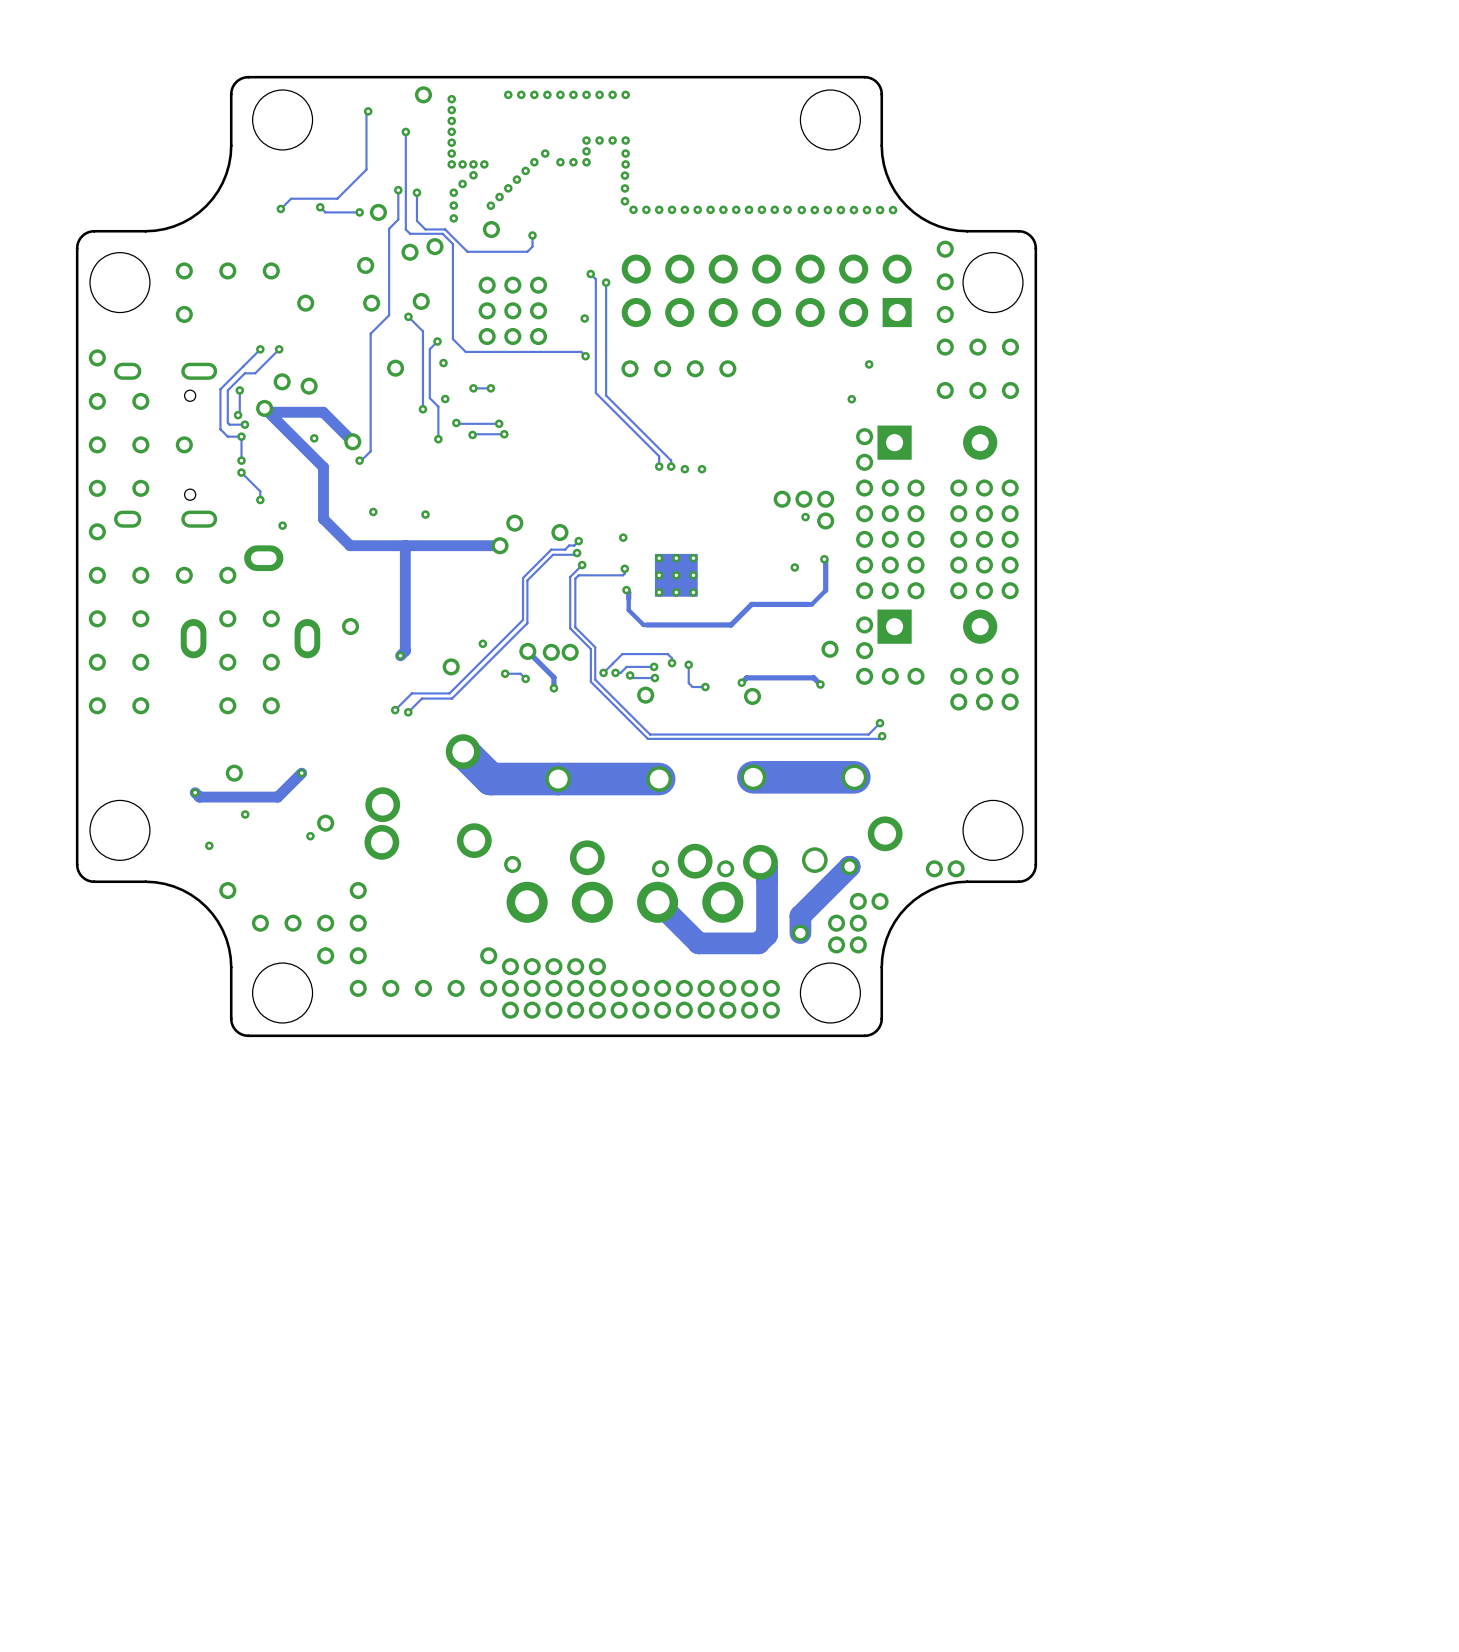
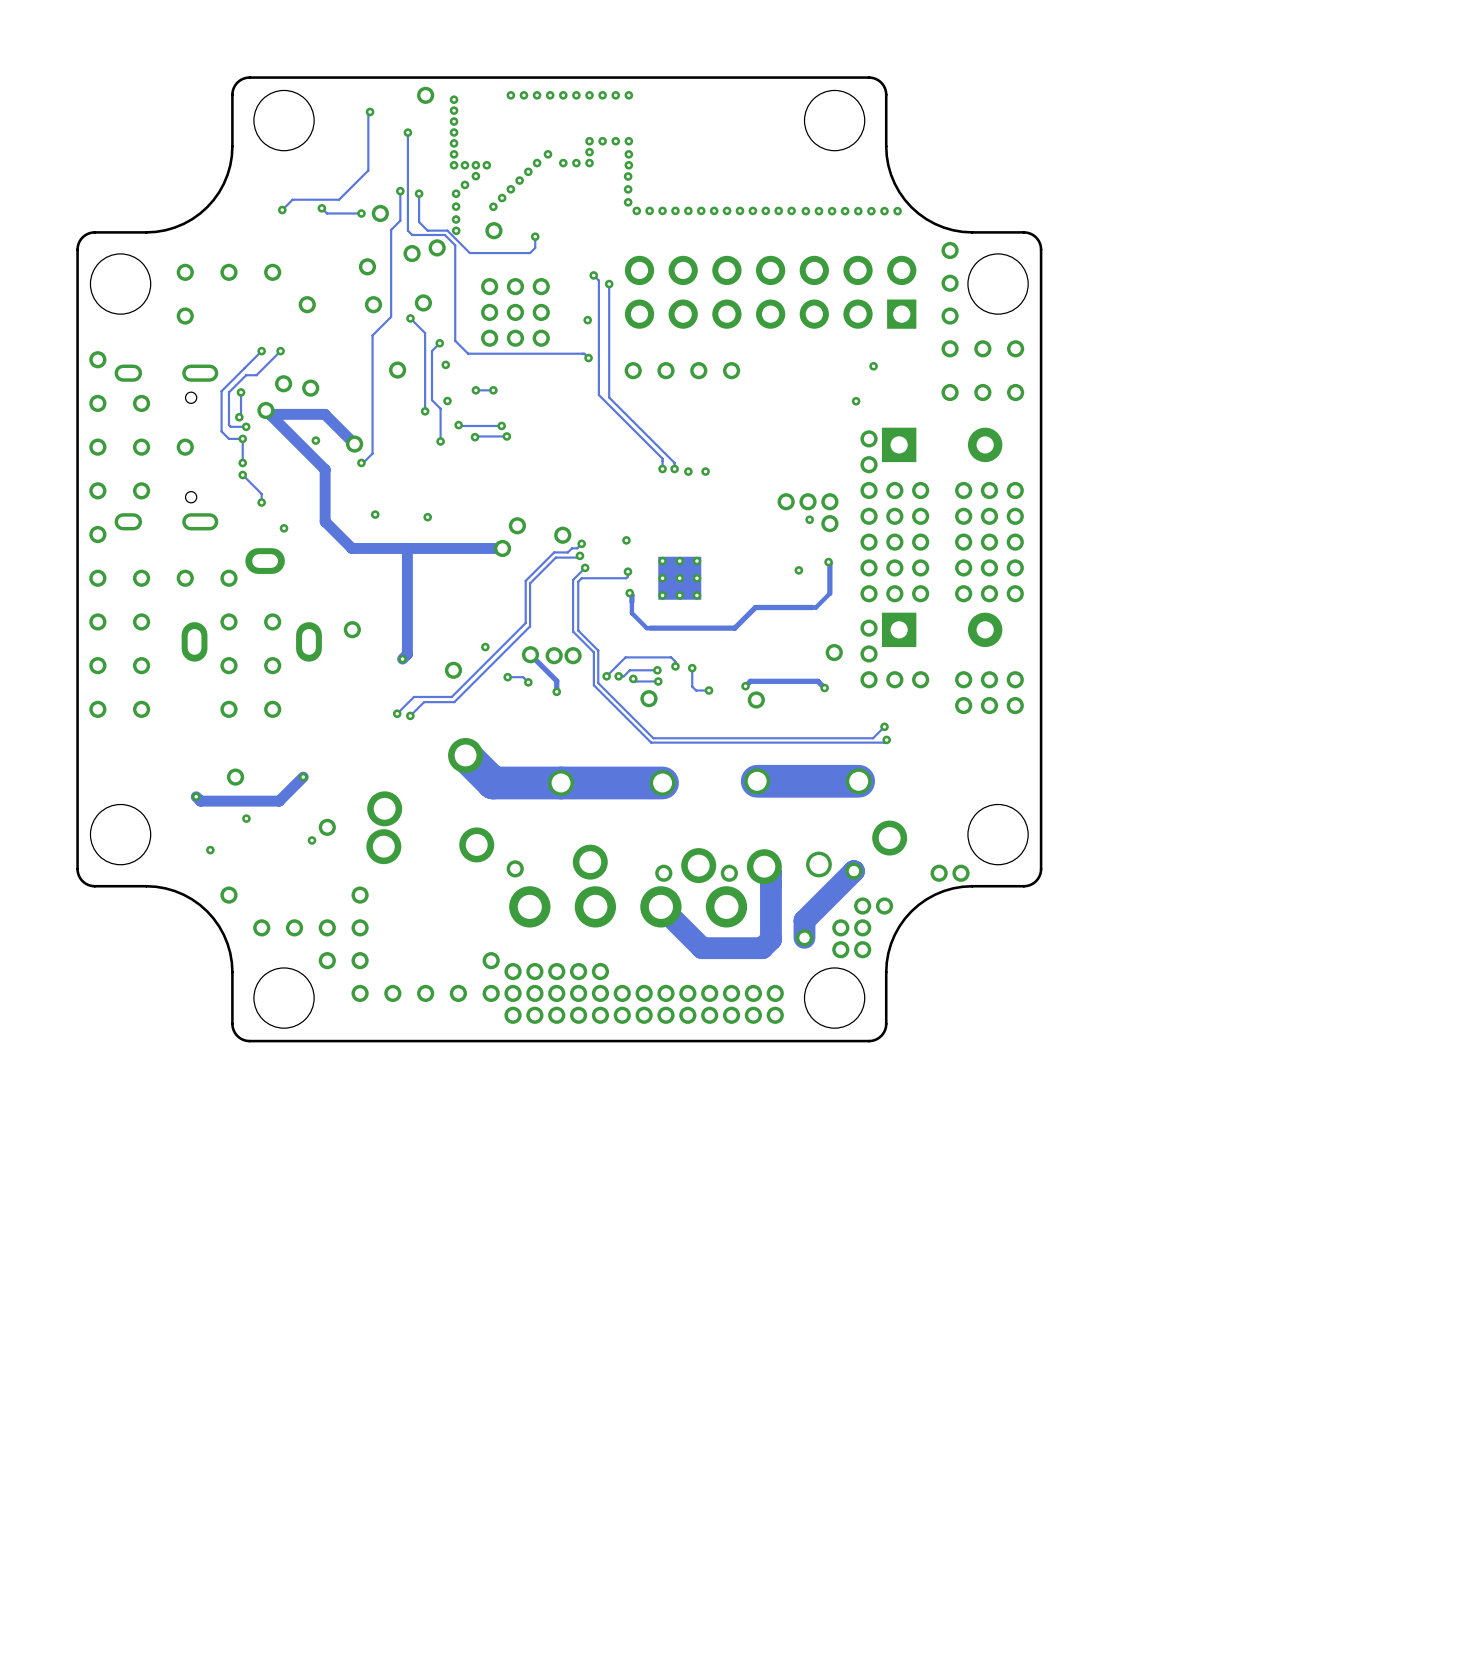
via: none -> (456, 230)

